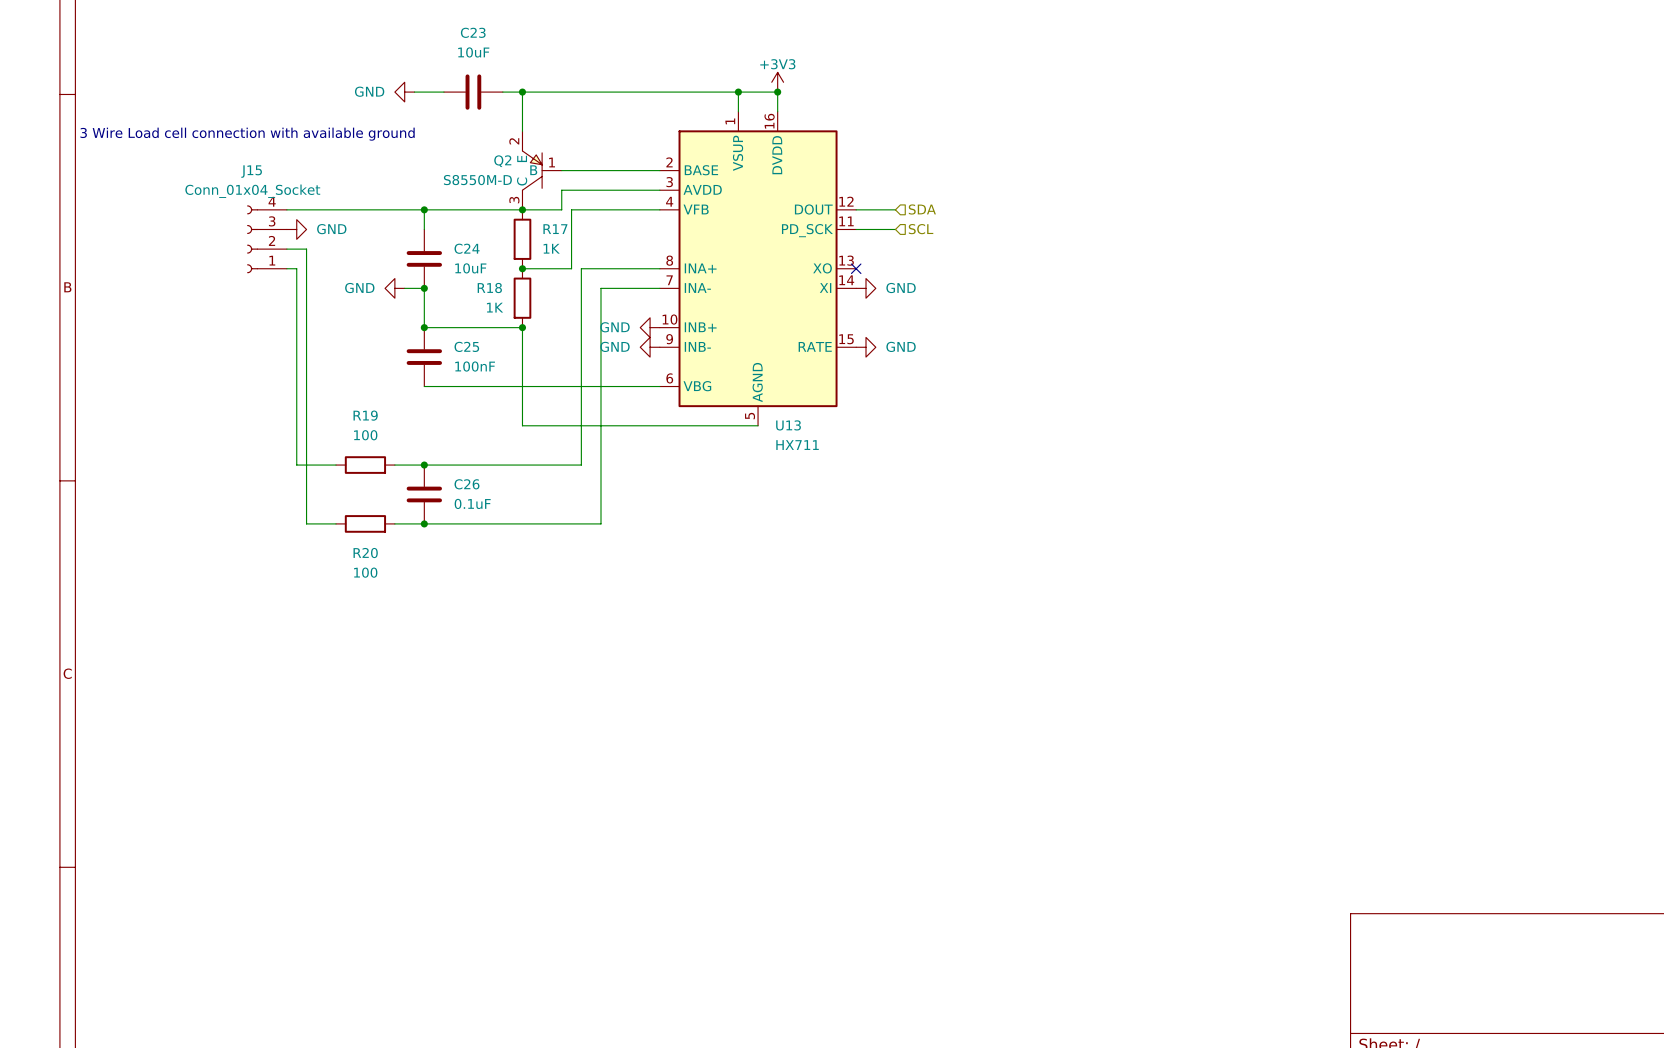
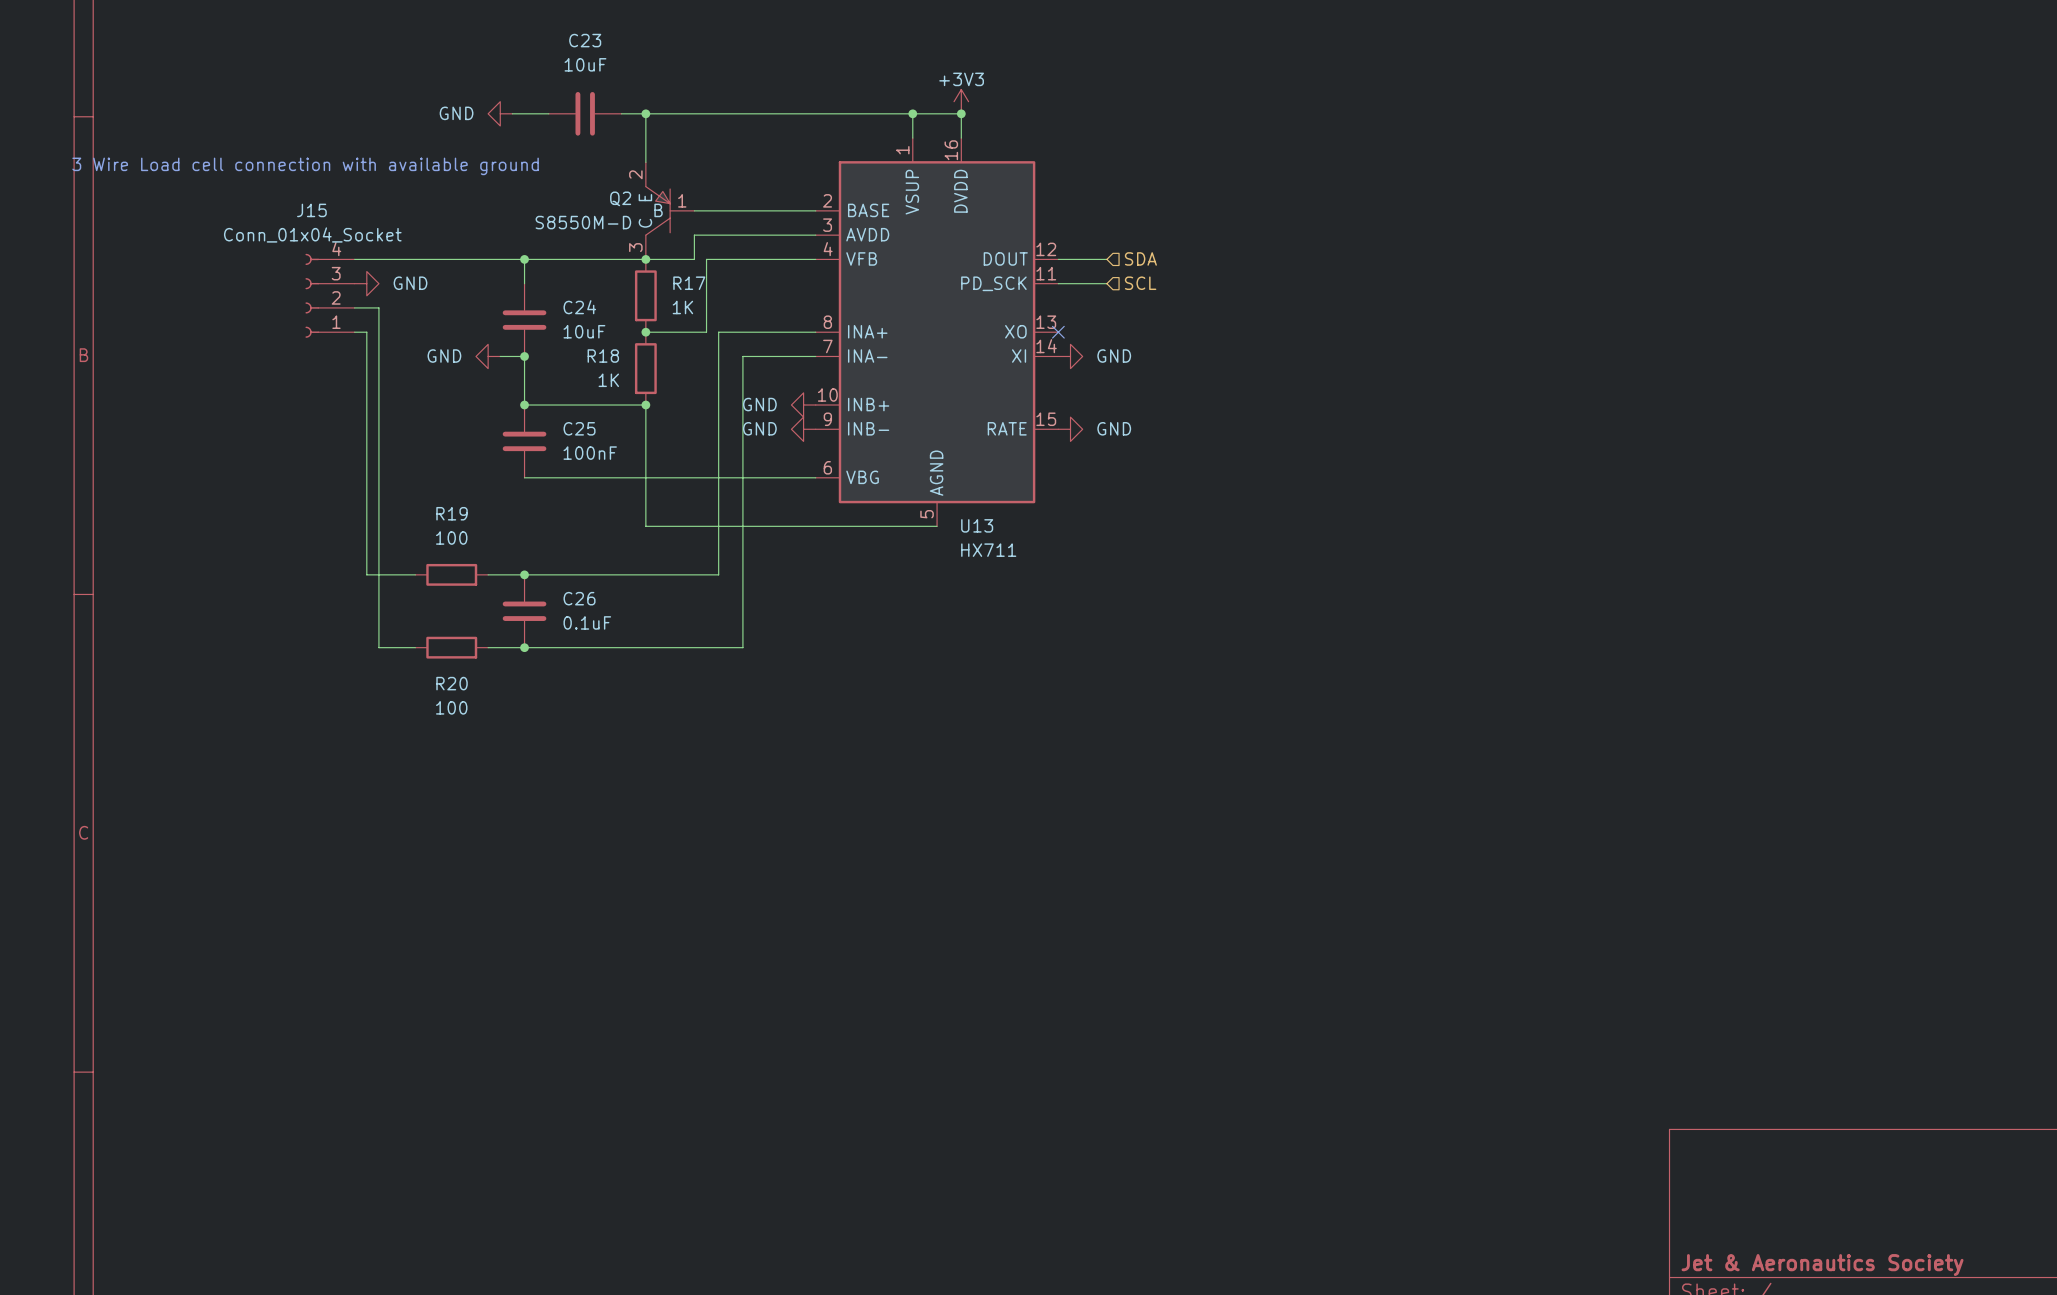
title block: none -> Jet & Aeronautics Society (1822, 1265)

